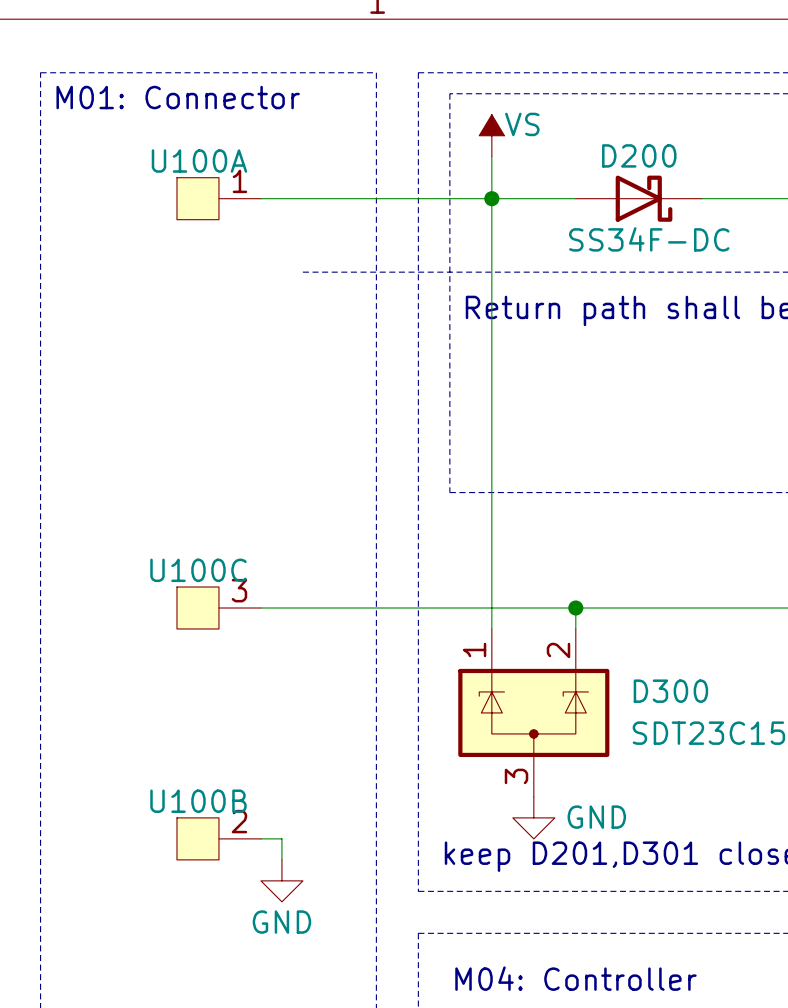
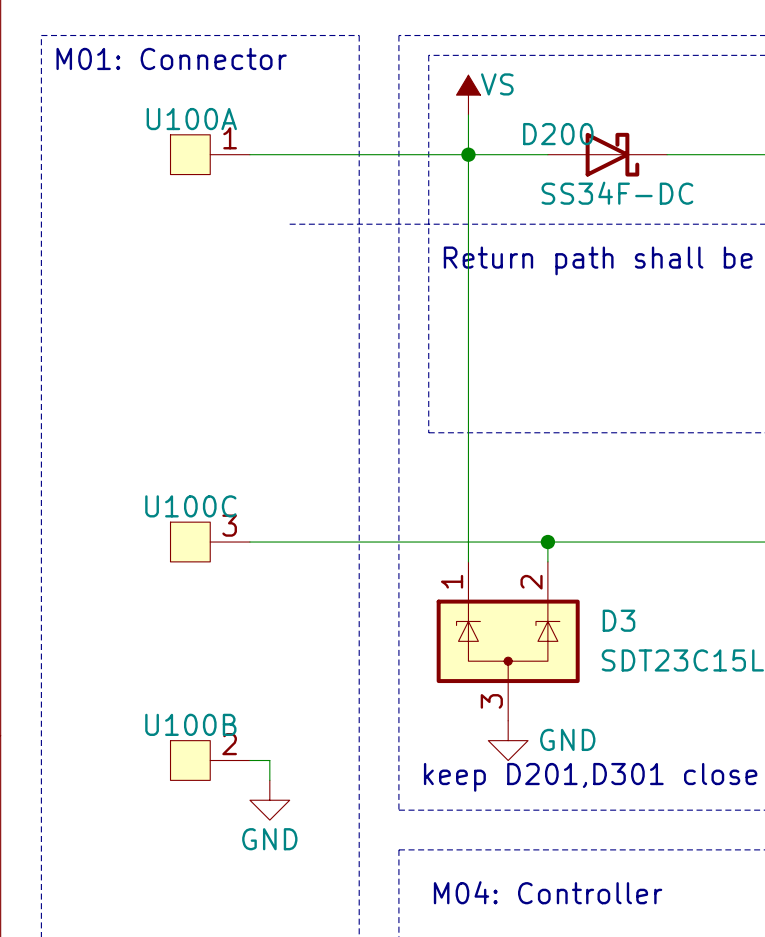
D200 name position: D200 (639, 155) -> D200 (558, 134)
D300 name: D300 (670, 691) -> D3 (618, 620)

